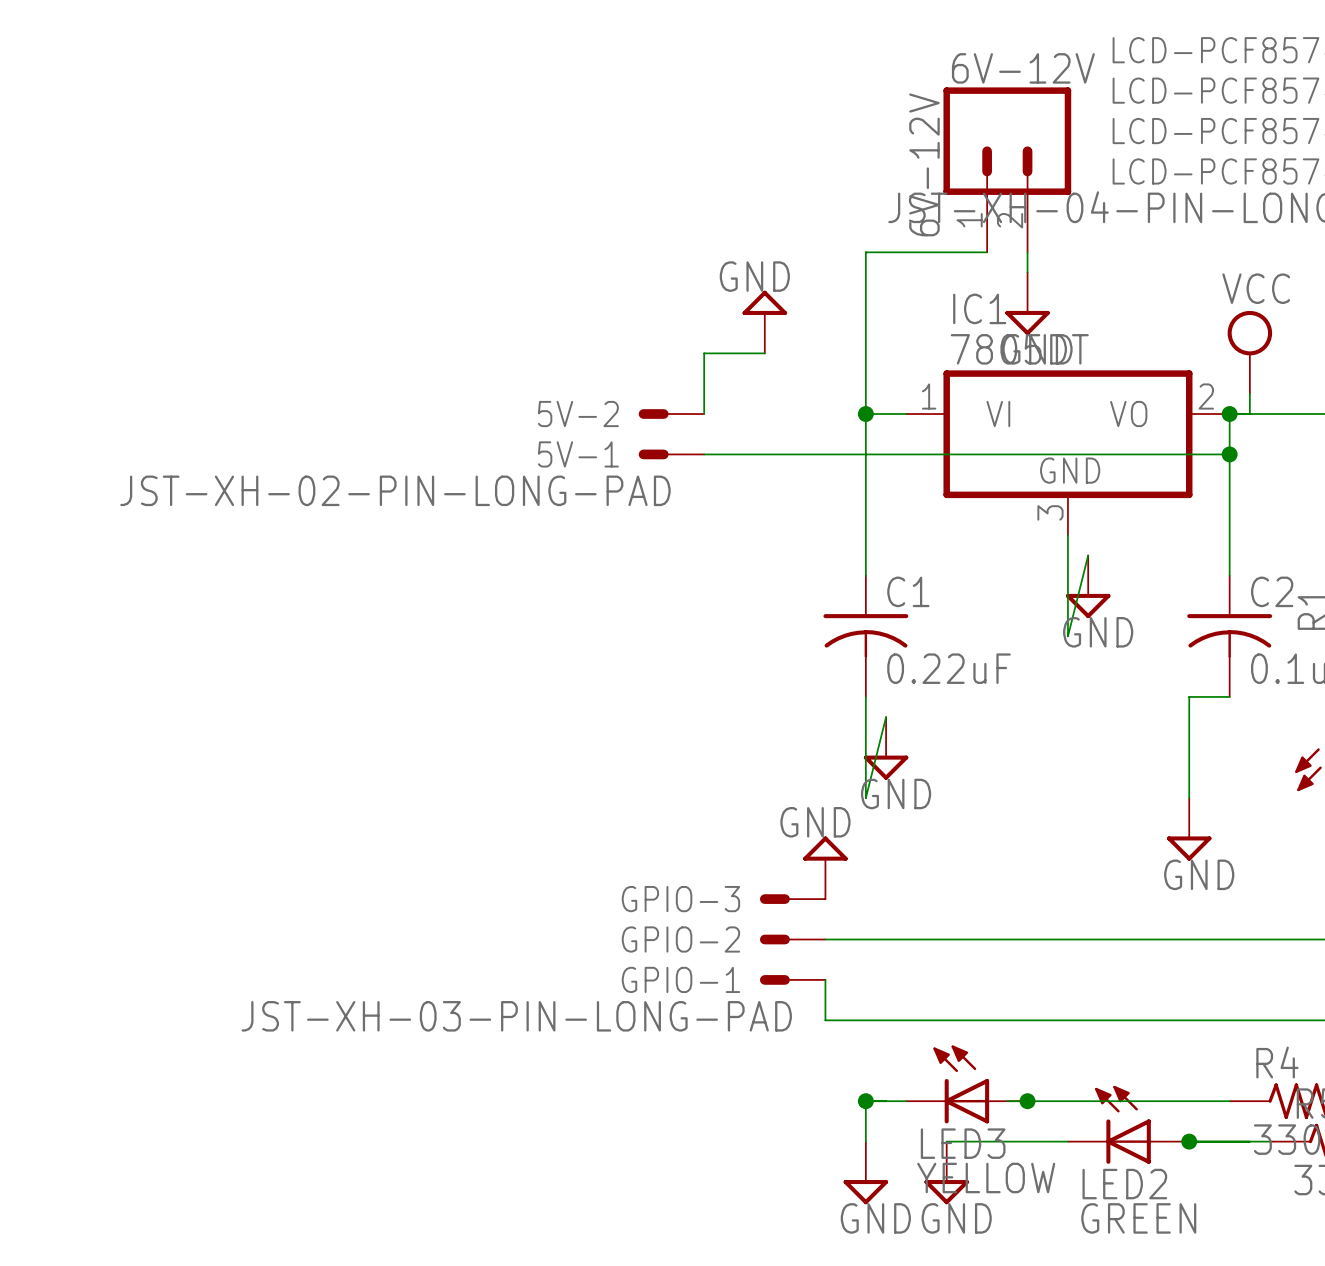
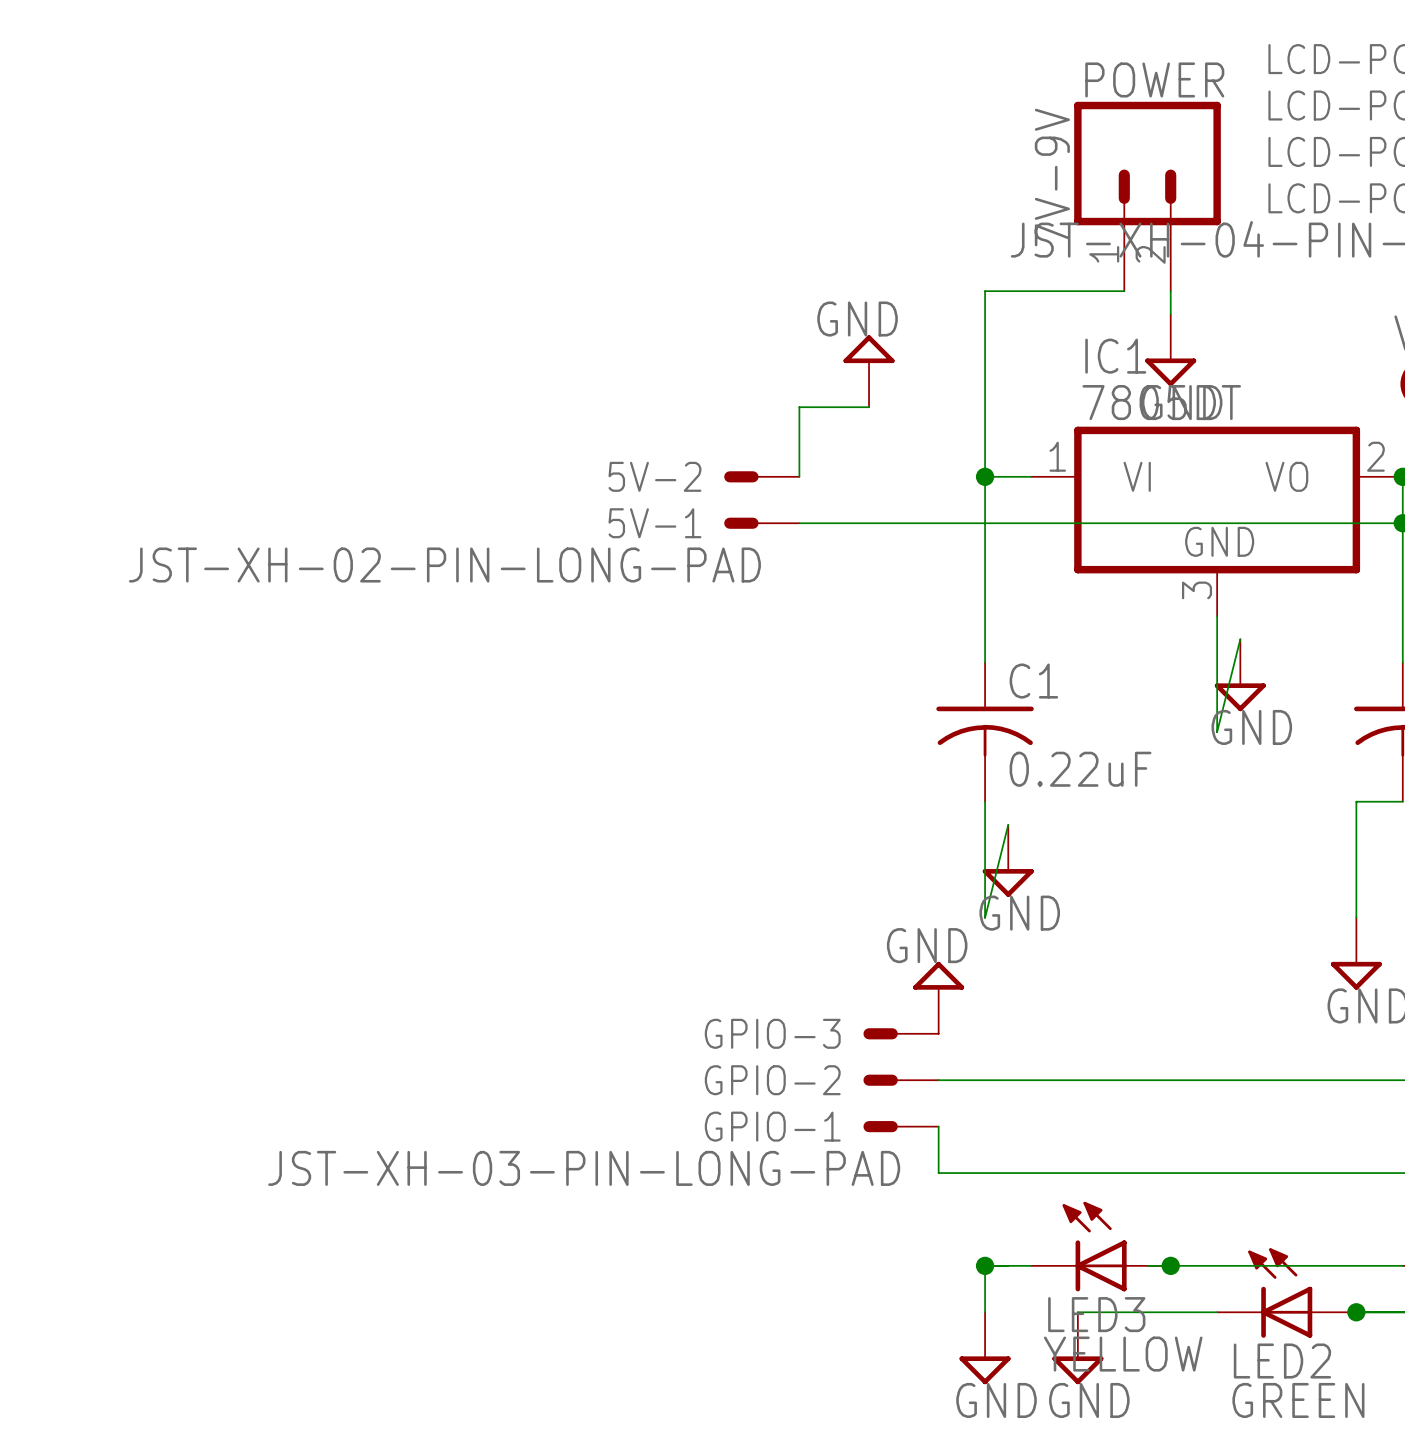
6V-12V name: 6V-12V (1023, 68) -> POWER (1154, 79)
6V-12V value: 6V-12V (924, 164) -> 7V-9V (1052, 177)

